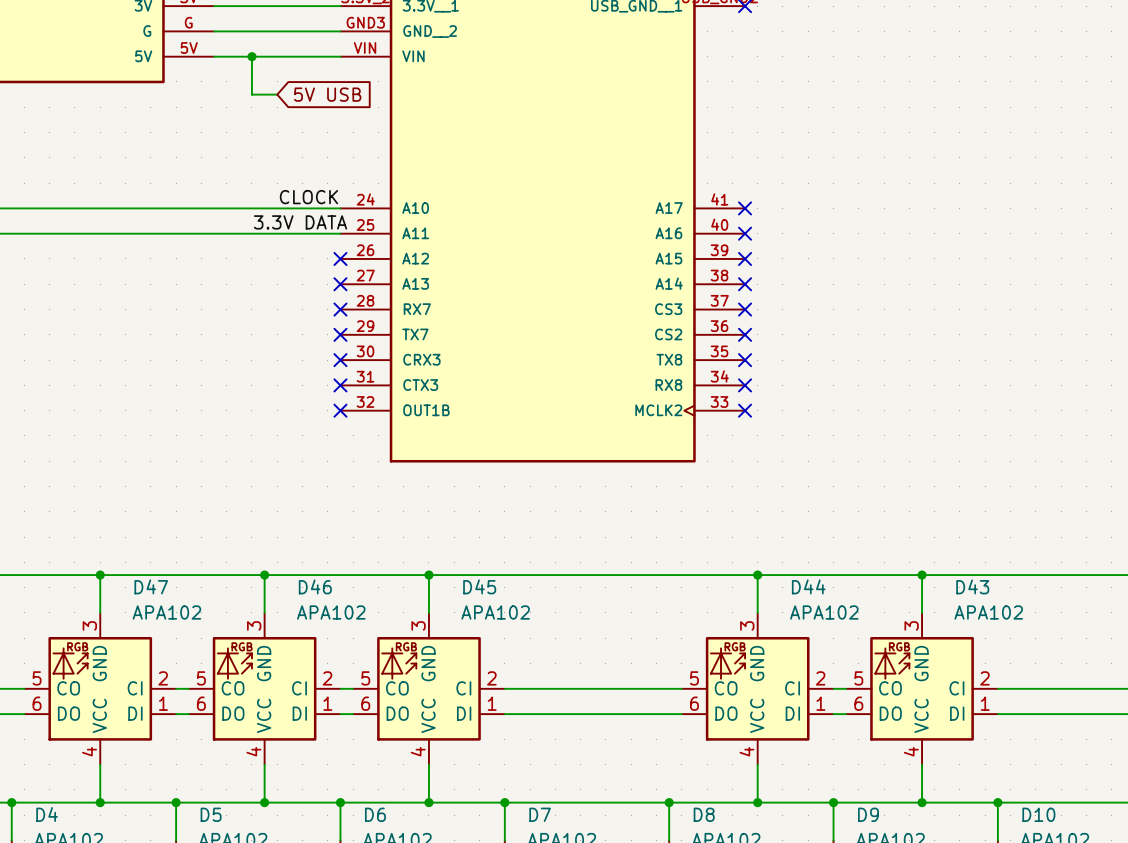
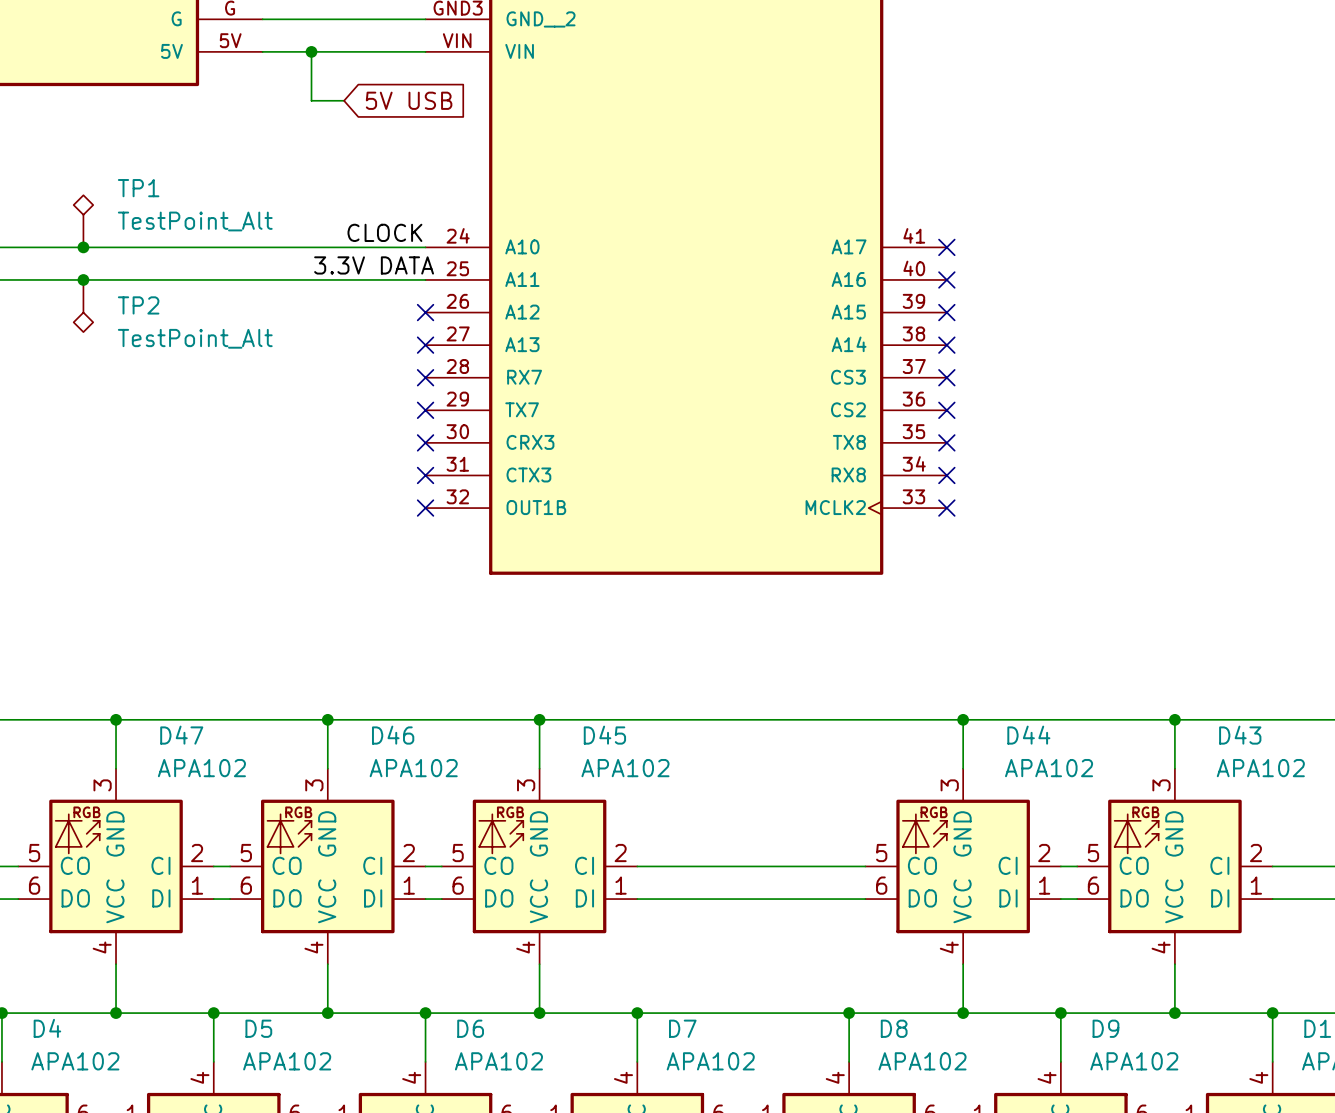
TP1: none -> TestPoint_Alt (83, 221)
junction: none -> (83, 247)
junction: none -> (83, 279)
TP2: none -> TestPoint_Alt (83, 306)

